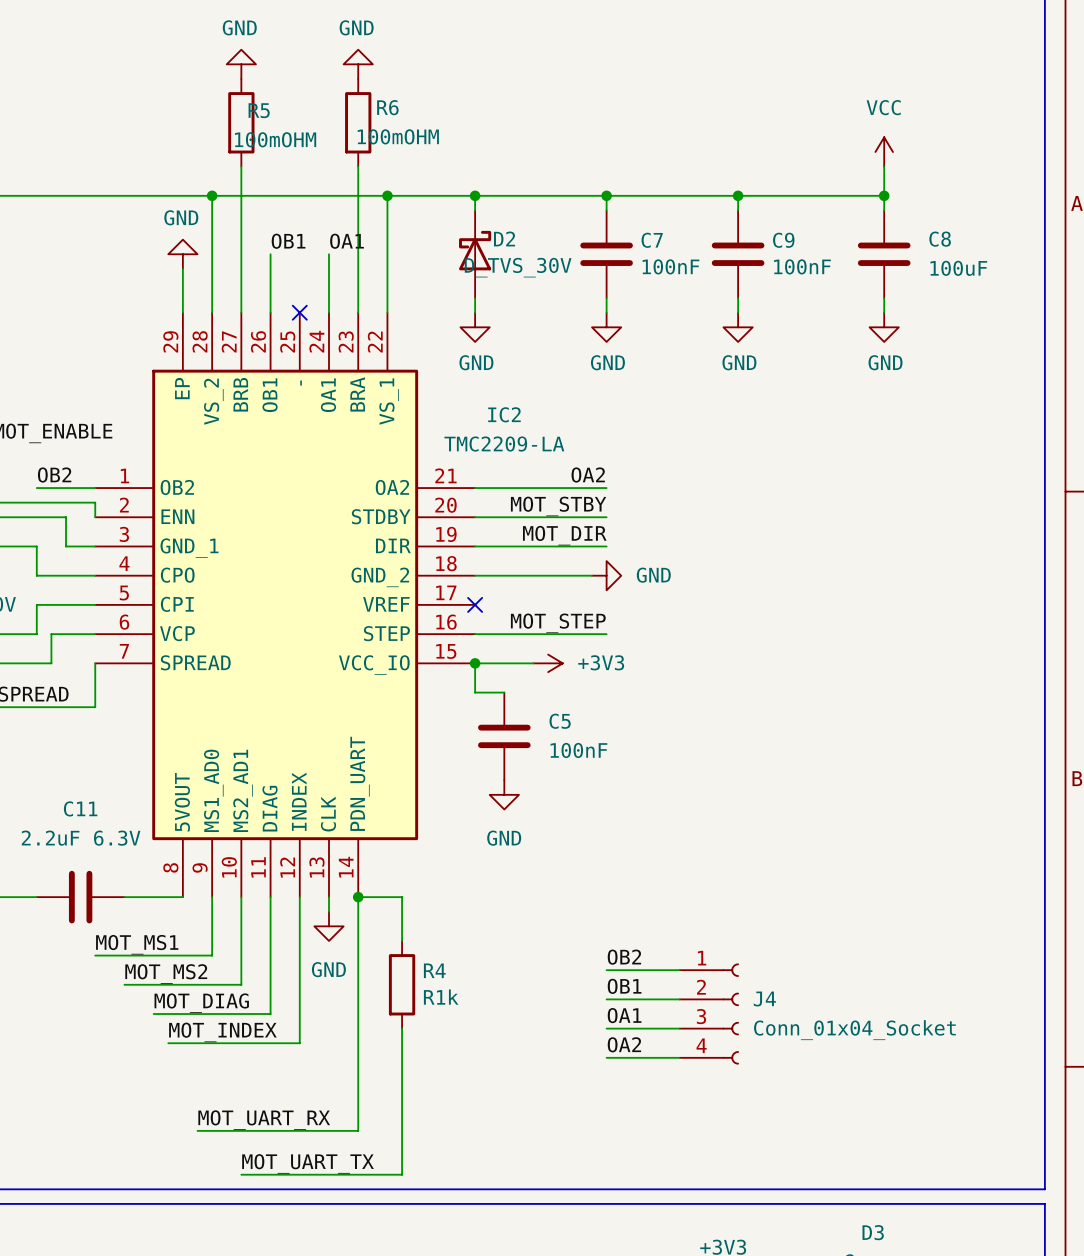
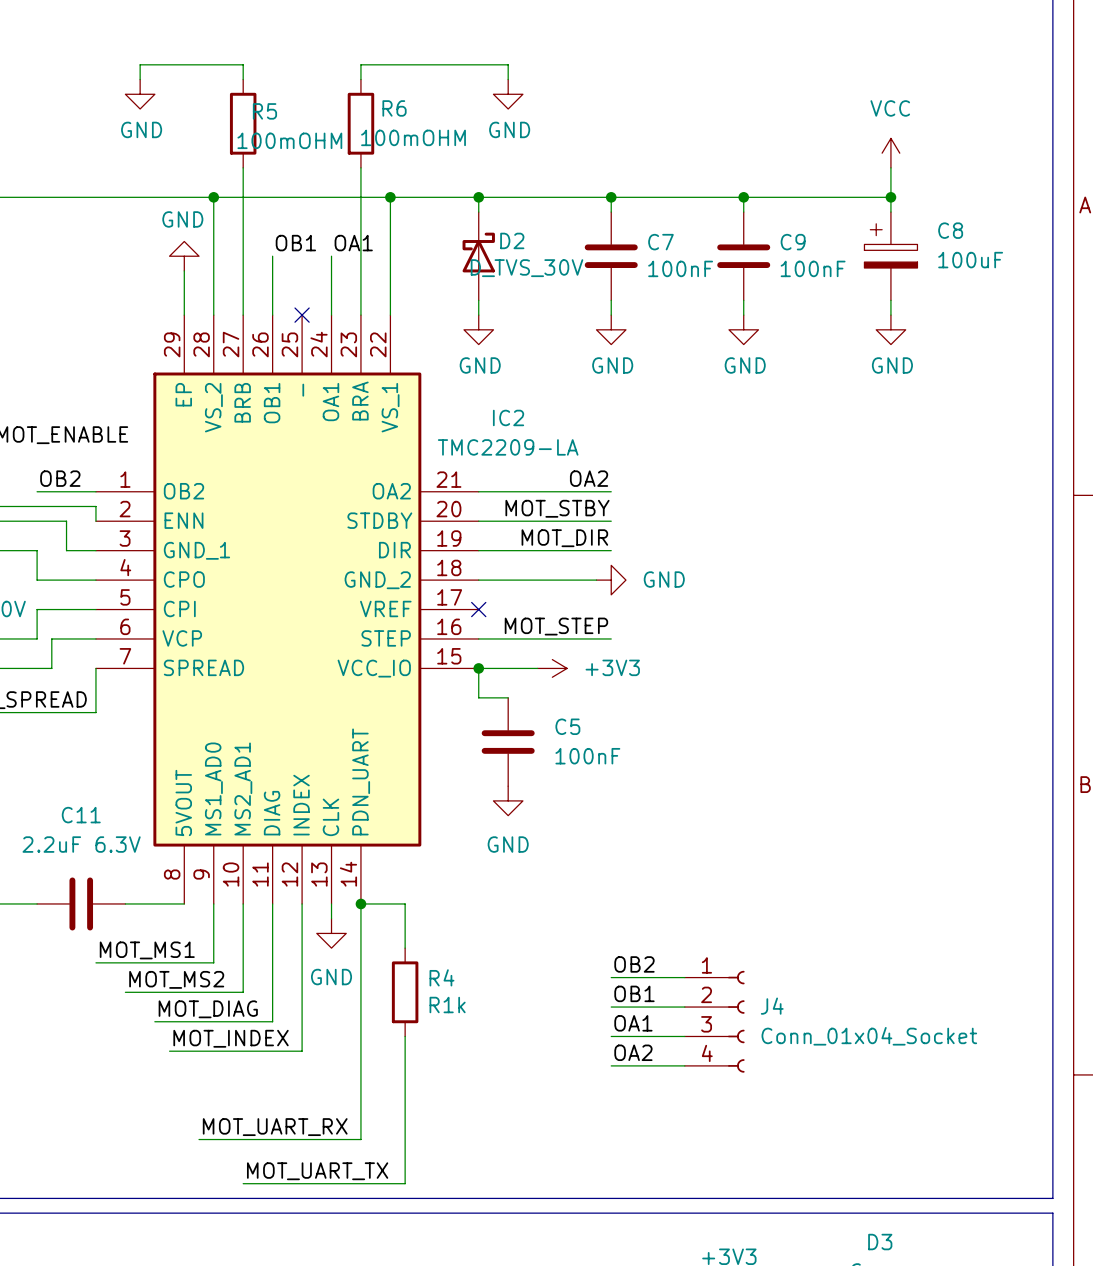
power symbol rotation: 0° (241, 64) -> 180° (140, 94)
power symbol position: GND (241, 64) -> GND (140, 94)
power symbol: GND (358, 64) -> none
wire: none -> (140, 79) (140, 64) (243, 64) (243, 79)
wire: none -> (360, 79) (360, 64) (508, 64) (508, 79)
power symbol: none -> GND (508, 94)
C8 symbol: [857, 210, 911, 299] -> [864, 212, 918, 301]

